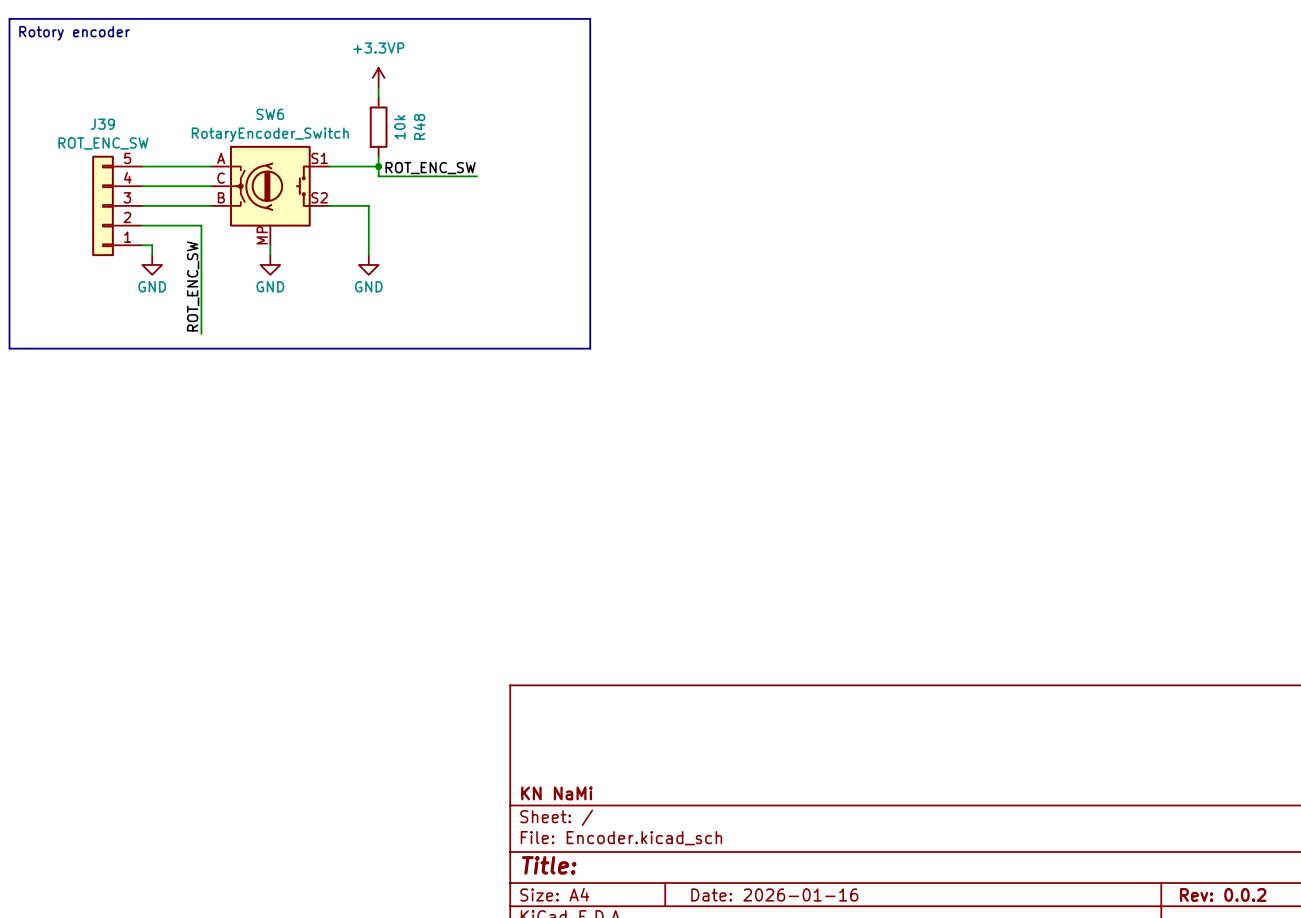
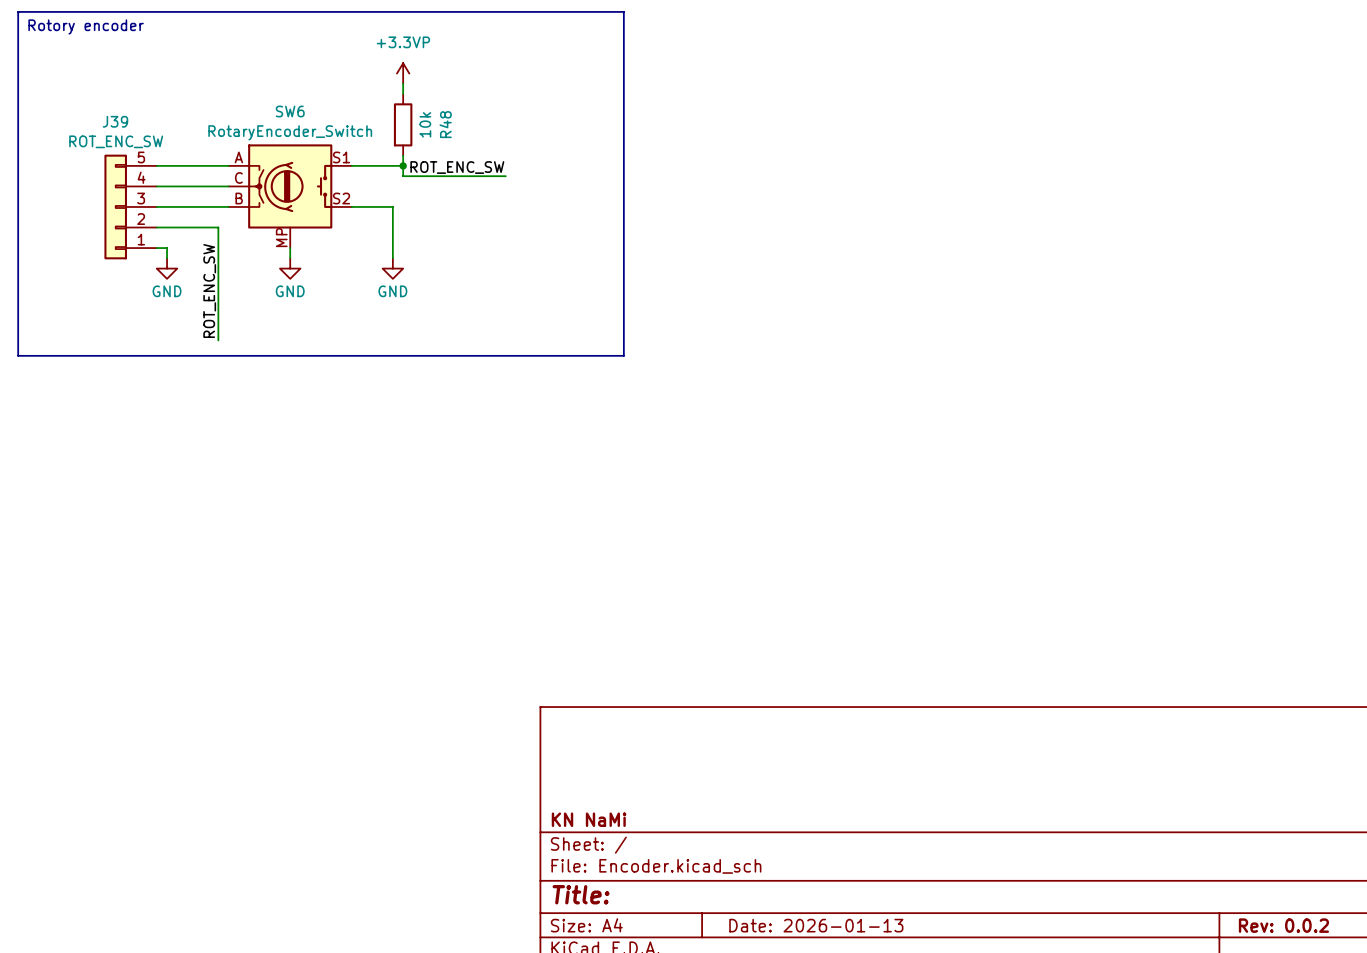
title block: Date: 2026-01-16 (774, 894) -> Date: 2026-01-13 (816, 925)

